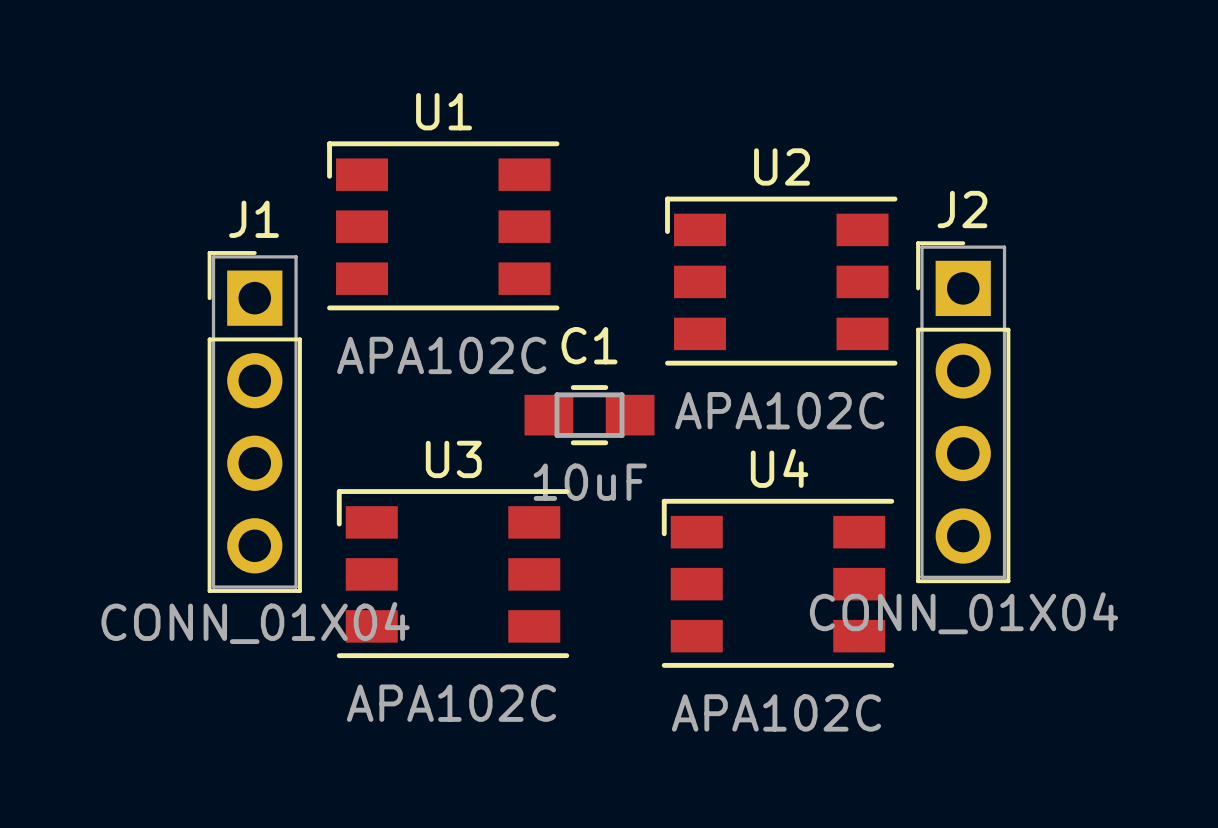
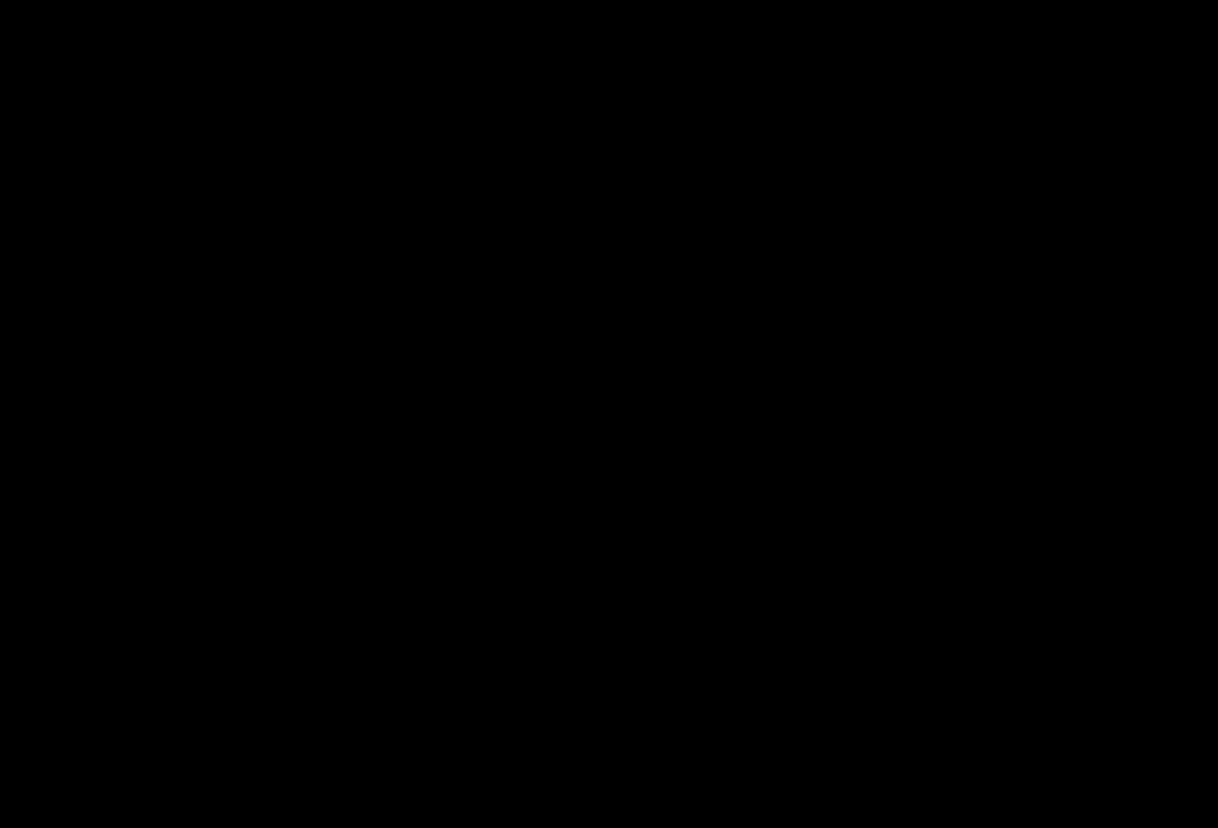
U1: APA102C (443, 225) -> none
U2: APA102C (781, 281) -> none
J2: CONN_01X04 (963, 412) -> none
C1: 10uF (589, 415) -> none
J1: CONN_01X04 (254, 421) -> none
U3: APA102C (453, 573) -> none
U4: APA102C (778, 583) -> none

